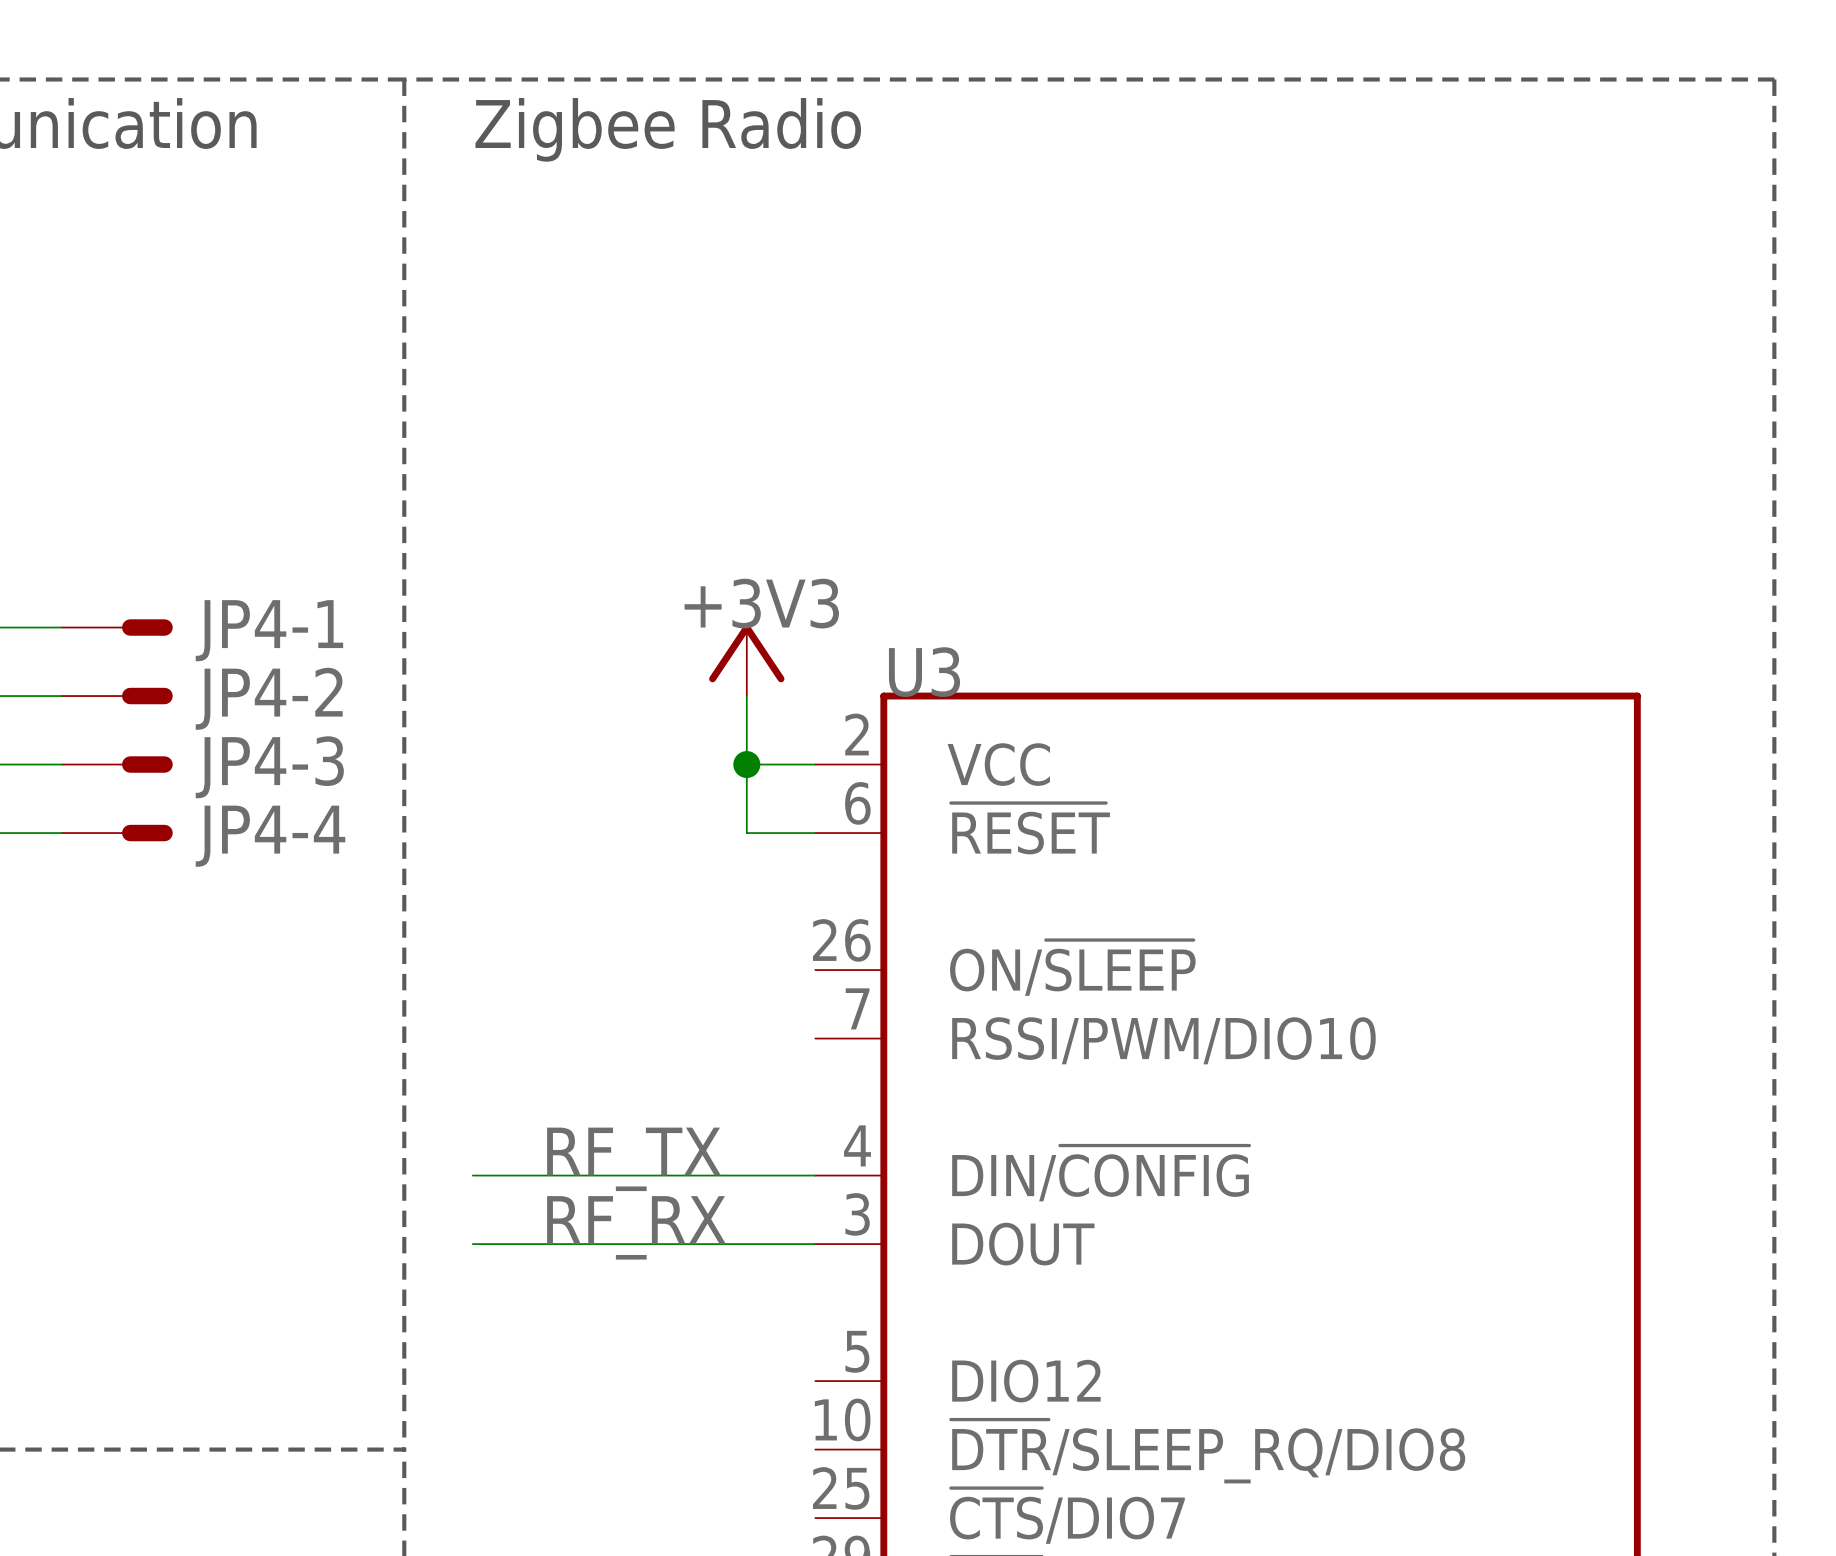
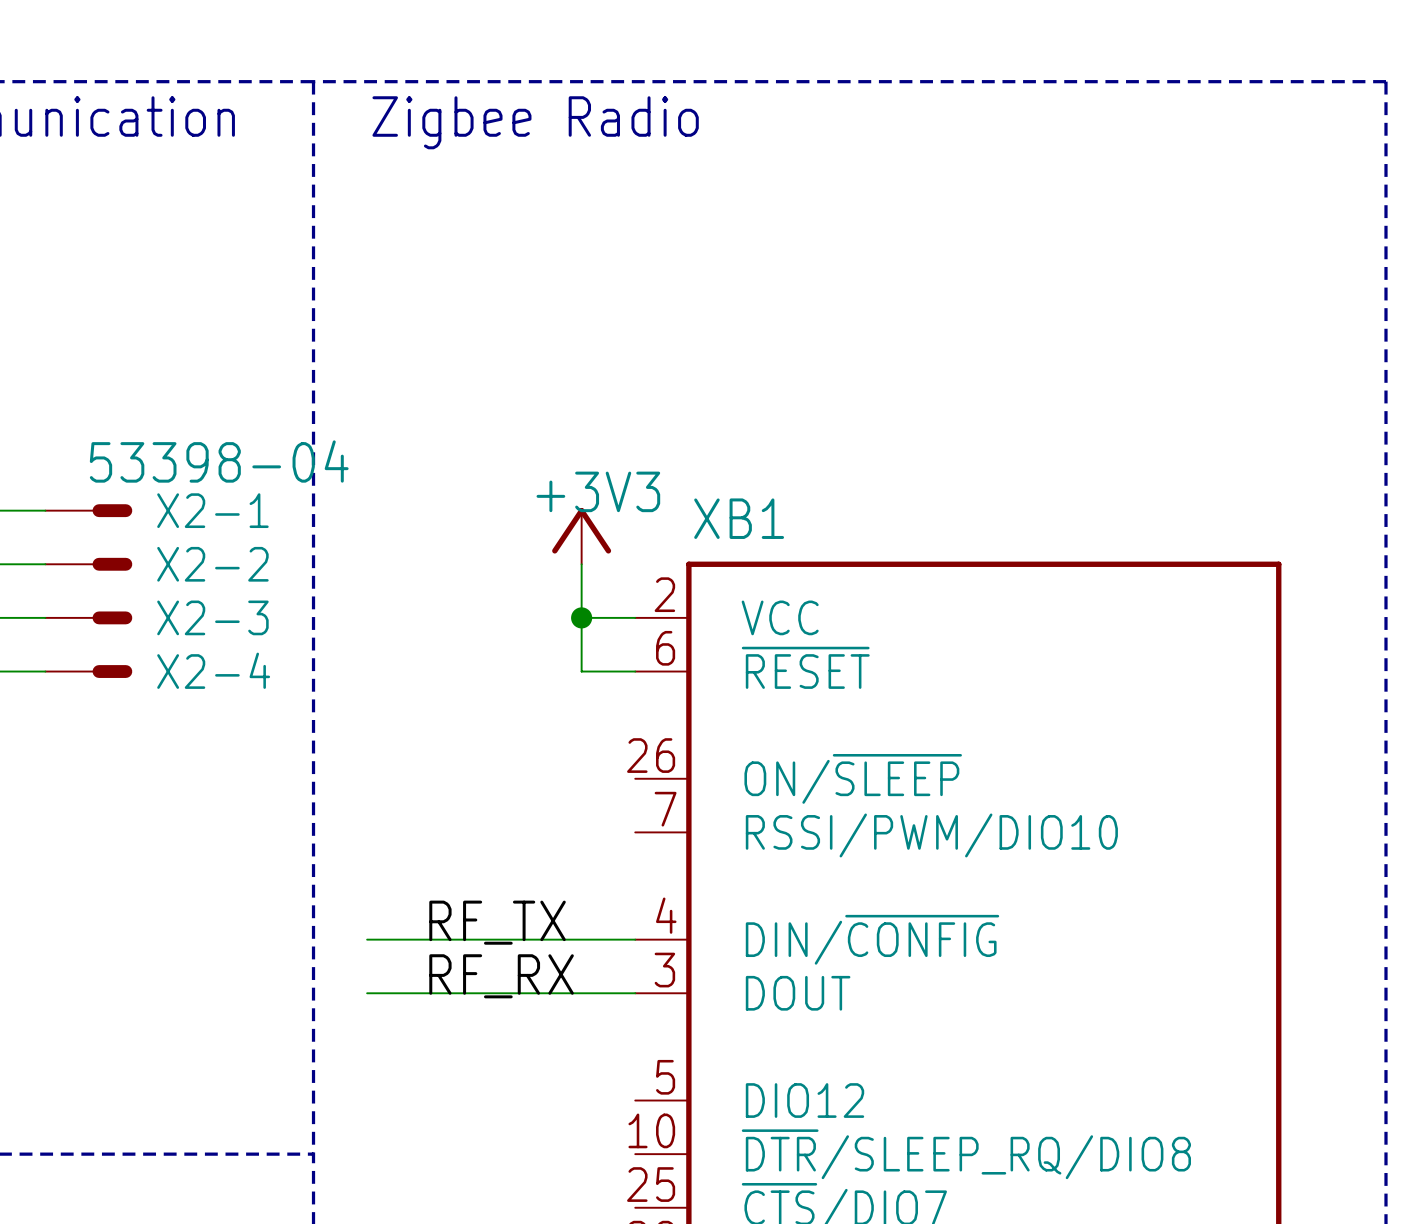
JP4-1 value: none -> 53398-04 (219, 461)
JP4-1 name: JP4-1 (269, 630) -> X2-1 (212, 510)
U3 name: U3 (924, 672) -> XB1 (739, 518)
JP4-2 name: JP4-2 (269, 698) -> X2-2 (212, 564)
JP4-3 name: JP4-3 (269, 767) -> X2-3 (212, 617)
JP4-4 name: JP4-4 (270, 836) -> X2-4 (213, 670)

